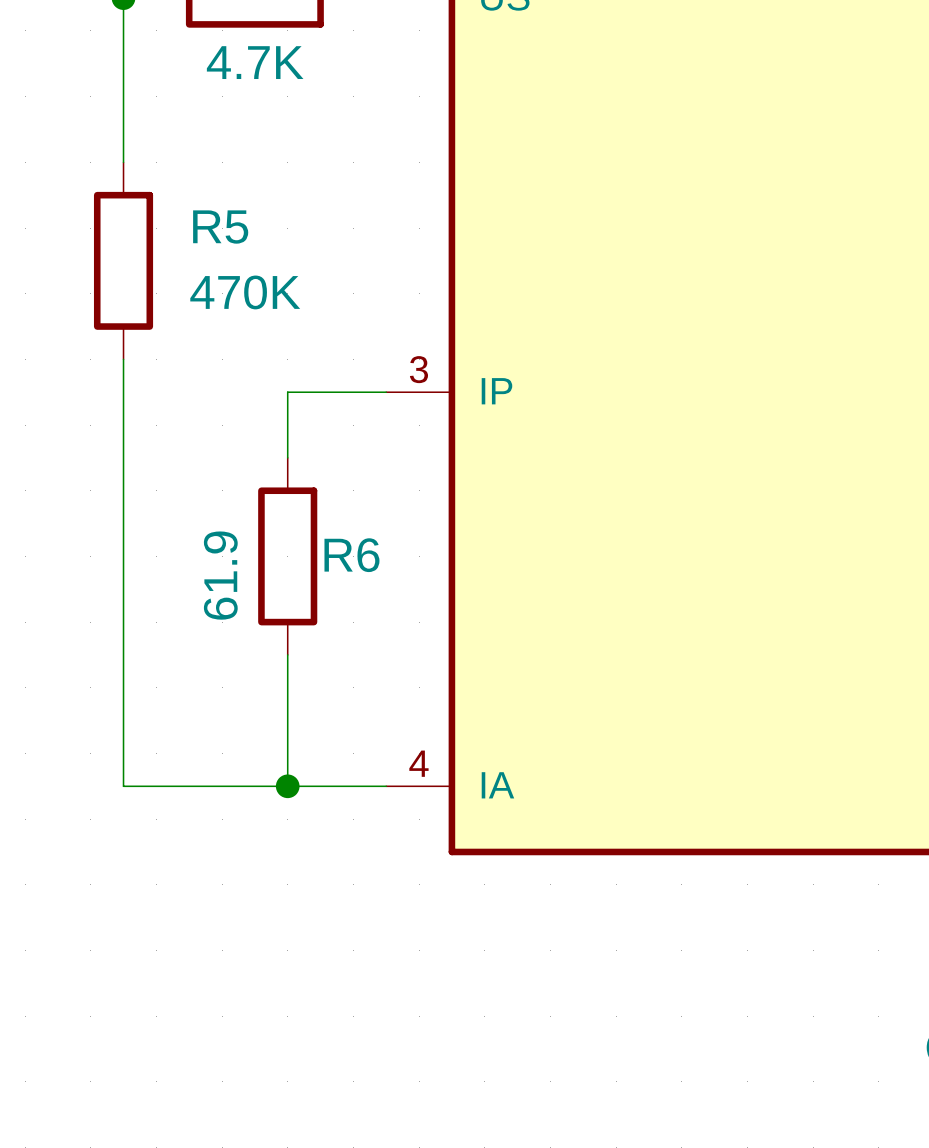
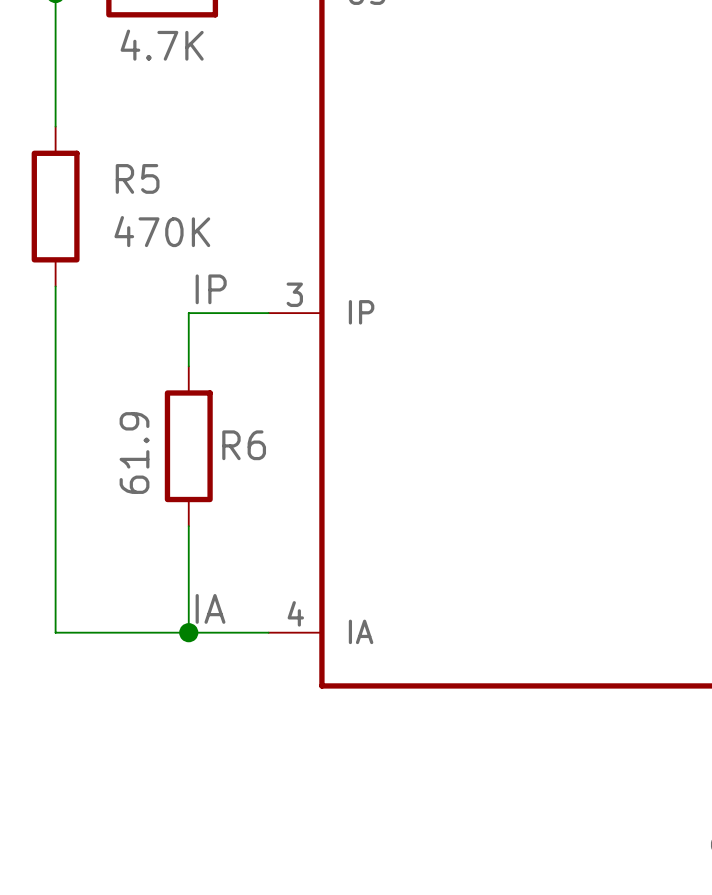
label: none -> IP (211, 289)
label: none -> IA (210, 608)

